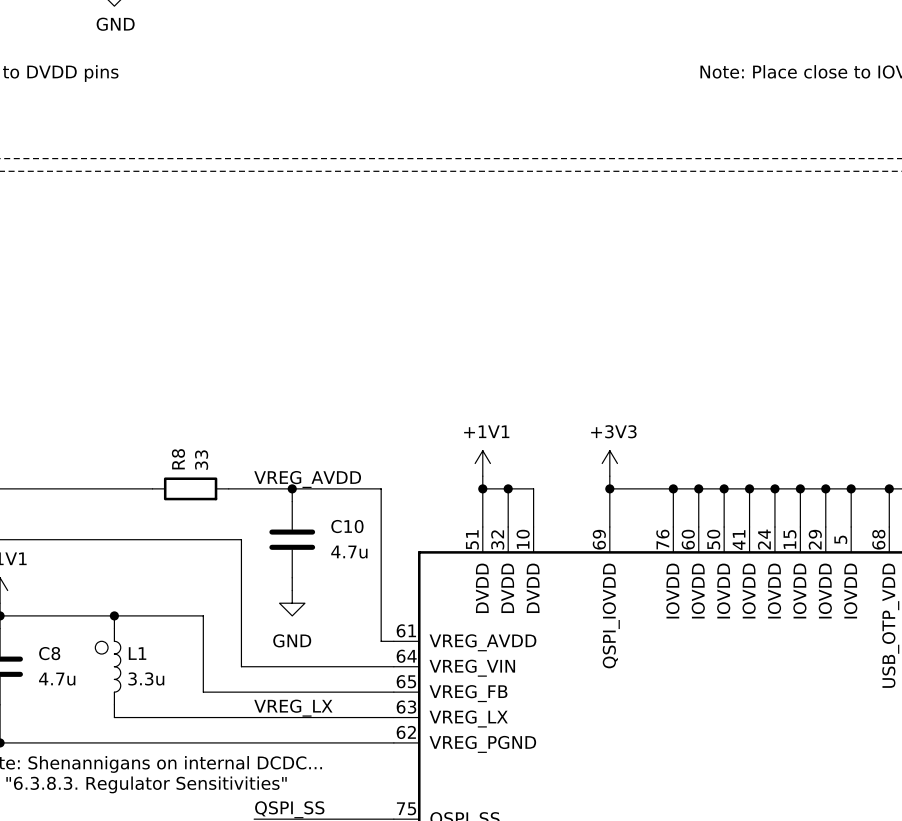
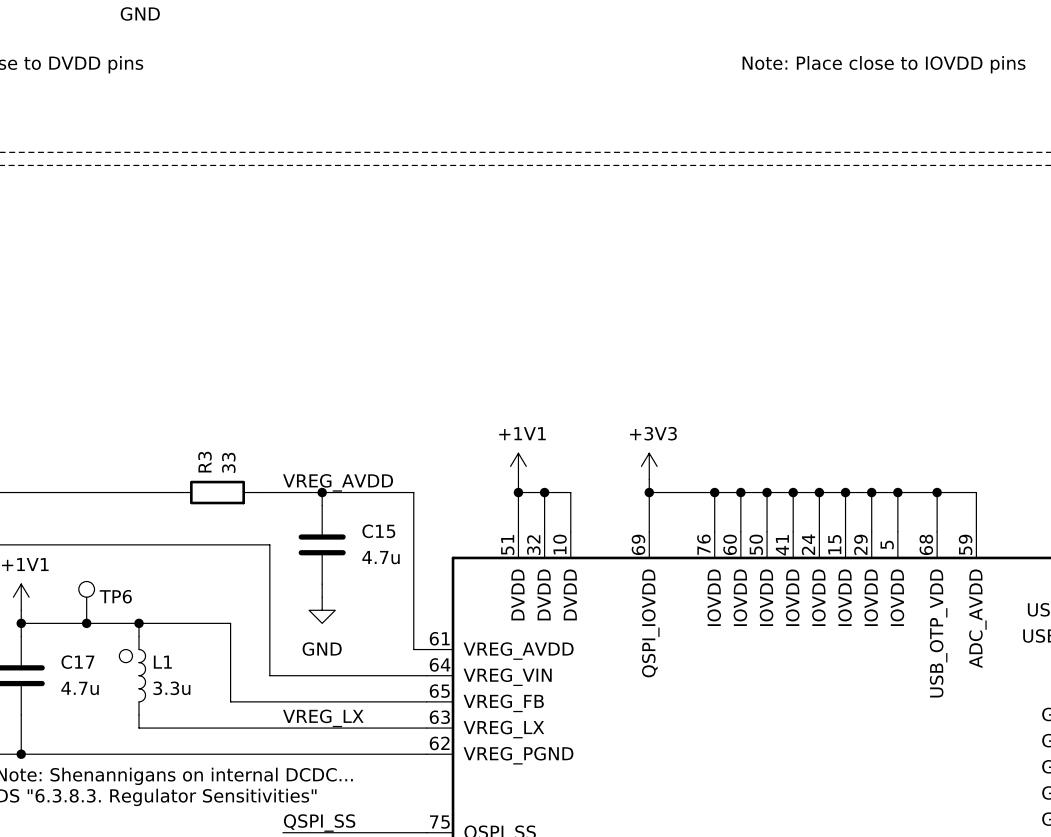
R8 name: R8 (178, 459) -> R3 (204, 462)
C10 name: C10 (347, 526) -> C15 (378, 531)
TP6: none -> (86, 602)
junction: none -> (86, 623)
C8 name: C8 (49, 653) -> C17 (77, 662)

